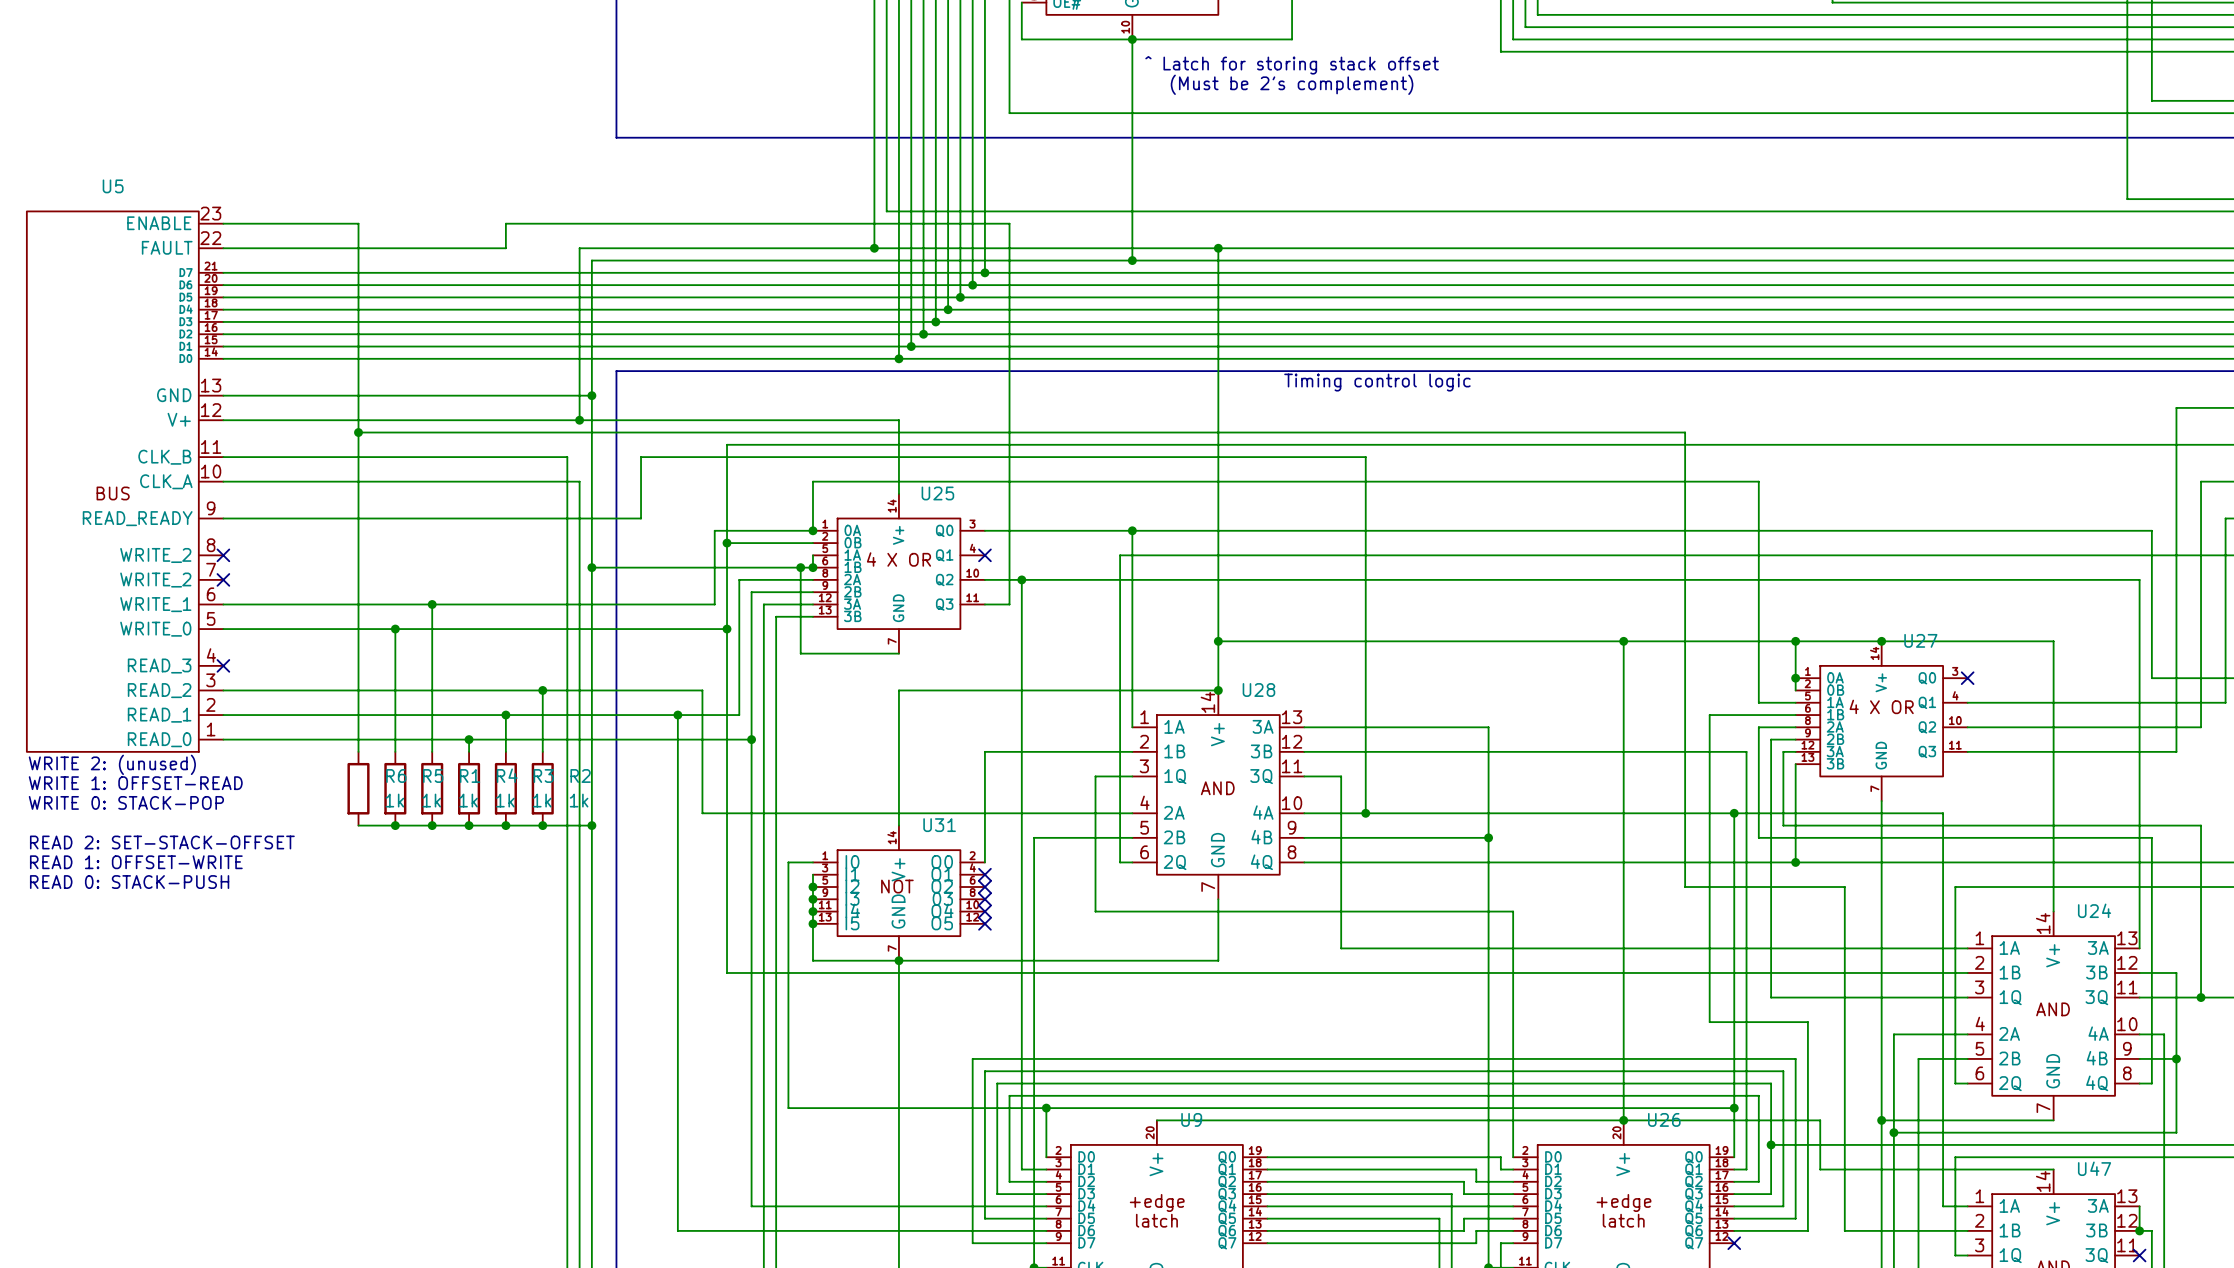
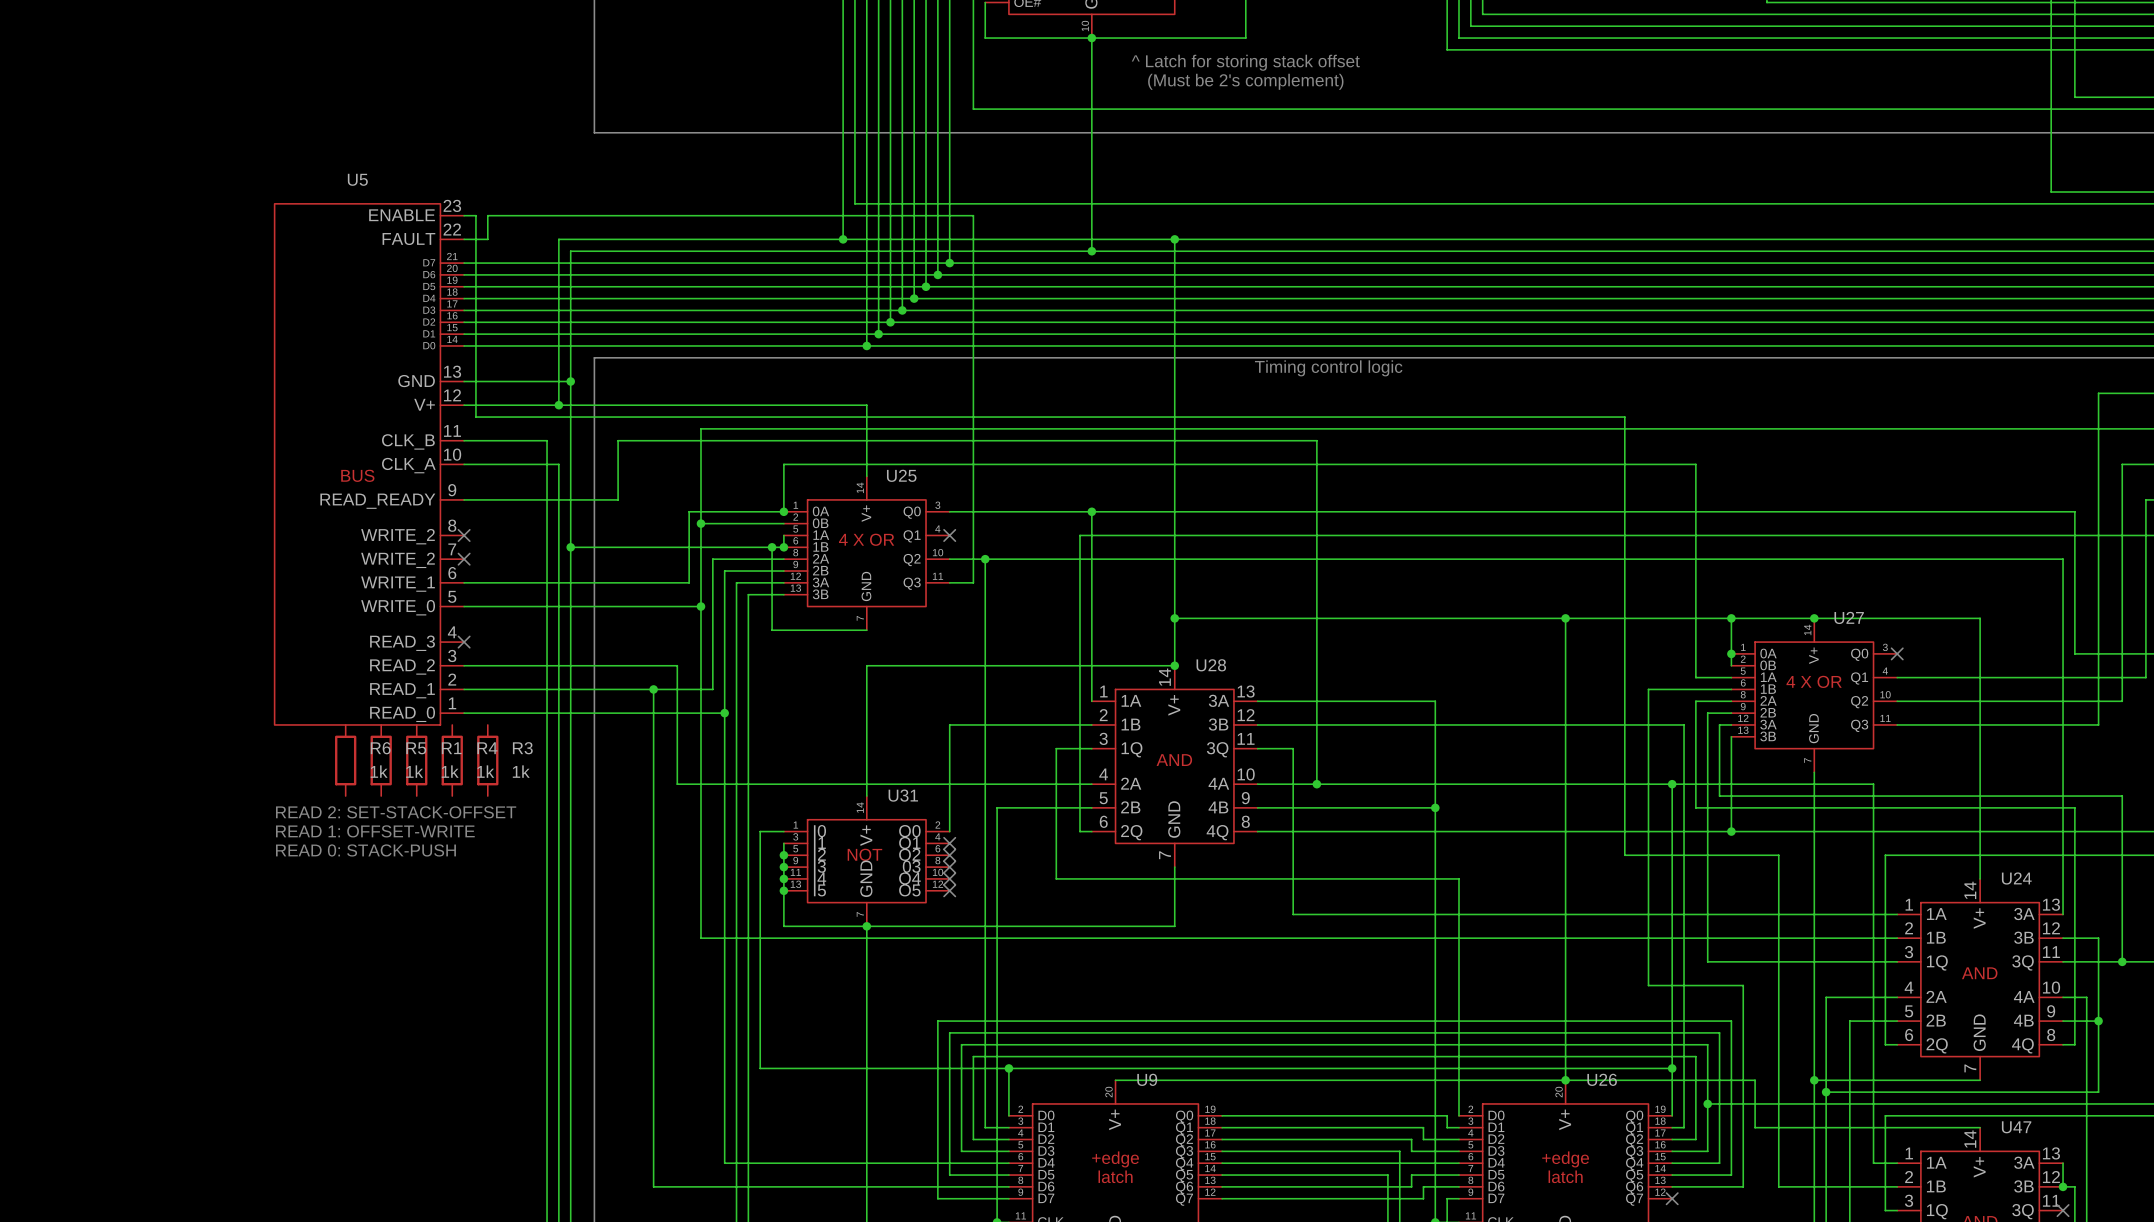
wire: (223, 223) (358, 223) (358, 751) -> none
wire: (223, 248) (481, 248) -> none
wire: (223, 272) (481, 272) -> none
wire: (223, 285) (481, 285) -> none
wire: (223, 297) (481, 297) -> none
wire: (223, 309) (481, 309) -> none
wire: (223, 321) (481, 321) -> none
wire: (223, 334) (481, 334) -> none
wire: (223, 346) (481, 346) -> none
wire: (223, 358) (481, 358) -> none
wire: (223, 395) (481, 395) -> none
wire: (223, 420) (481, 420) -> none
wire: (358, 432) (493, 432) -> (464, 215) (475, 215) (475, 417)
junction: (358, 432) -> none
wire: (223, 457) (481, 457) -> none
U5 position: (125, 481) -> (369, 464)
wire: (223, 481) (481, 481) -> none
wire: (223, 518) (481, 518) -> none
no-connect mark: (223, 555) -> none
no-connect mark: none -> (464, 535)
no-connect mark: (223, 579) -> none
no-connect mark: none -> (464, 559)
wire: (223, 604) (481, 604) -> none
wire: (432, 604) (432, 751) -> none
junction: (432, 604) -> none
wire: (223, 629) (481, 629) -> none
wire: (395, 629) (395, 751) -> none
junction: (395, 629) -> none
no-connect mark: (223, 665) -> none
no-connect mark: none -> (464, 642)
wire: (223, 690) (481, 690) -> none
wire: (542, 690) (542, 751) -> none
junction: (542, 690) -> none
wire: (223, 715) (481, 715) -> none
wire: (505, 715) (505, 751) -> none
junction: (505, 715) -> none
wire: (223, 739) (481, 739) -> none
wire: (469, 739) (469, 751) -> none
junction: (469, 739) -> none
text: WRITE 2: (unused) (112, 764) -> none
text: WRITE 1: OFFSET-READ (135, 783) -> none
R2: 1k (542, 788) -> none
text: WRITE 0: STACK-POP (126, 802) -> none
wire: (358, 825) (591, 825) -> none
junction: (395, 825) -> none
junction: (432, 825) -> none
junction: (469, 825) -> none
junction: (505, 825) -> none
junction: (542, 825) -> none
junction: (591, 825) -> none
text: READ 2: SET-STACK-OFFSET (162, 842) -> none
text: none -> READ 2: SET-STACK-OFFSET (396, 812)
text: READ 1: OFFSET-WRITE (136, 862) -> none
text: none -> READ 1: OFFSET-WRITE (375, 831)
text: READ 0: STACK-PUSH (129, 882) -> none
text: none -> READ 0: STACK-PUSH (365, 850)

